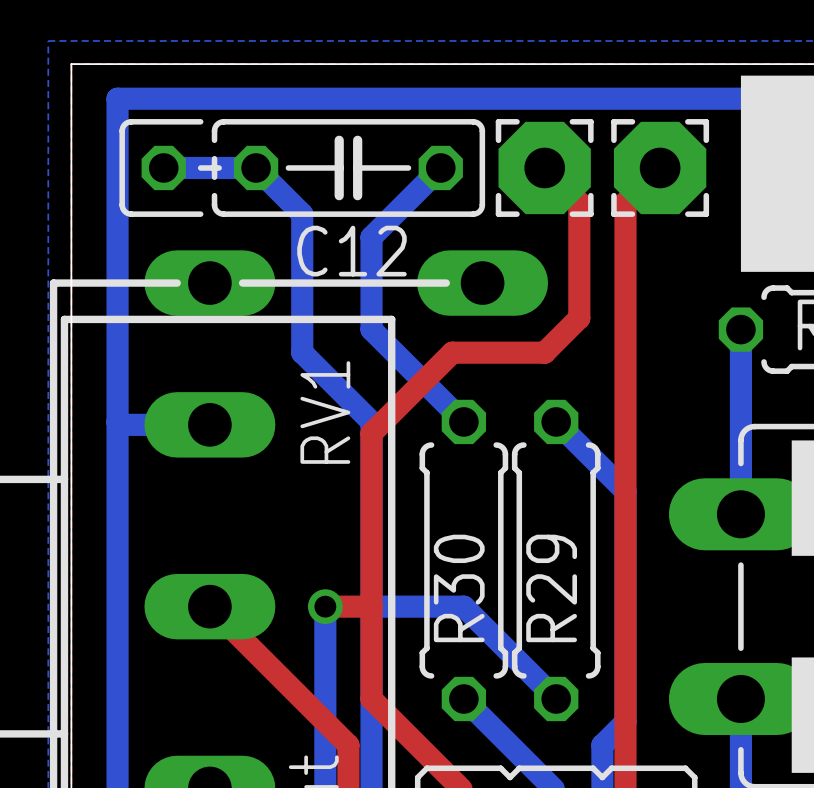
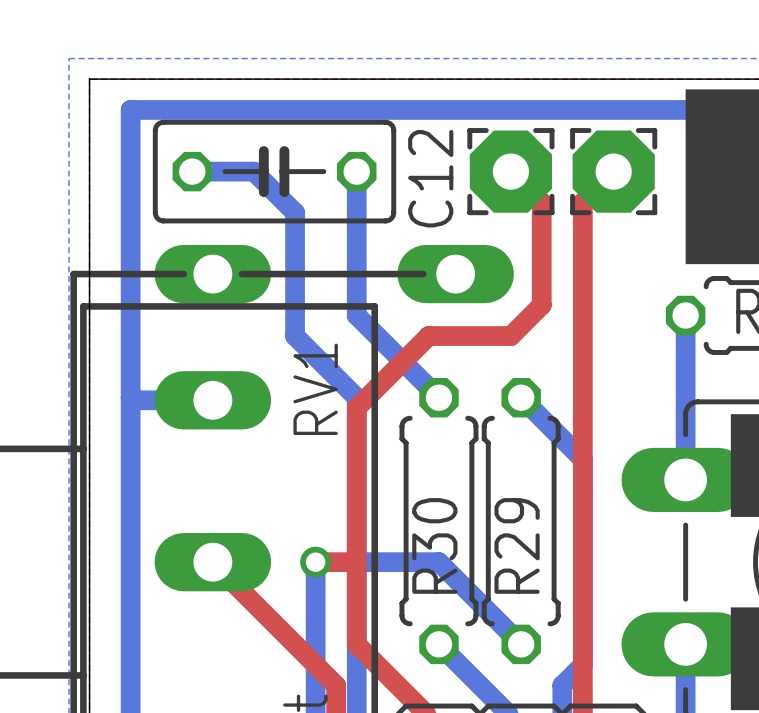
C12 footprint: [119, 119, 486, 217] -> [152, 119, 397, 224]
bottom track: (440, 167) (371, 237) -> (356, 171) (356, 233)
C12 name position: C12 (351, 251) -> C12 (430, 178)

